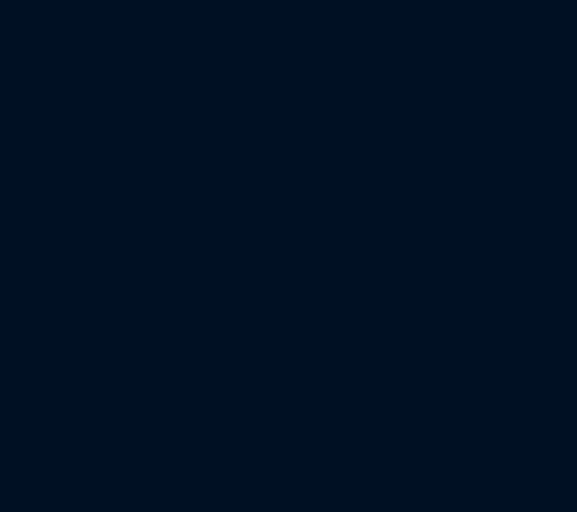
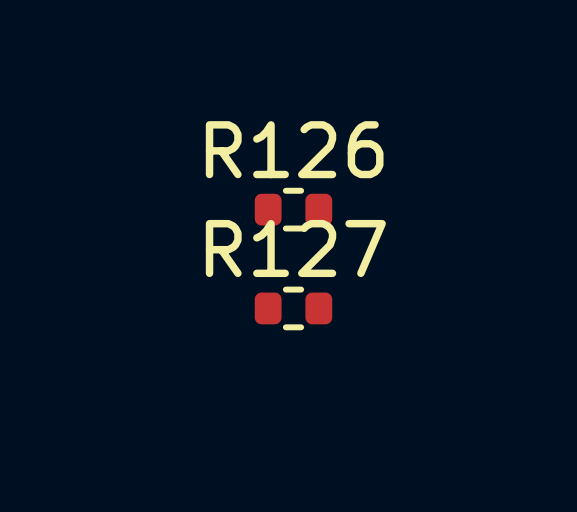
R126: none -> (293, 209)
R127: none -> (293, 308)

